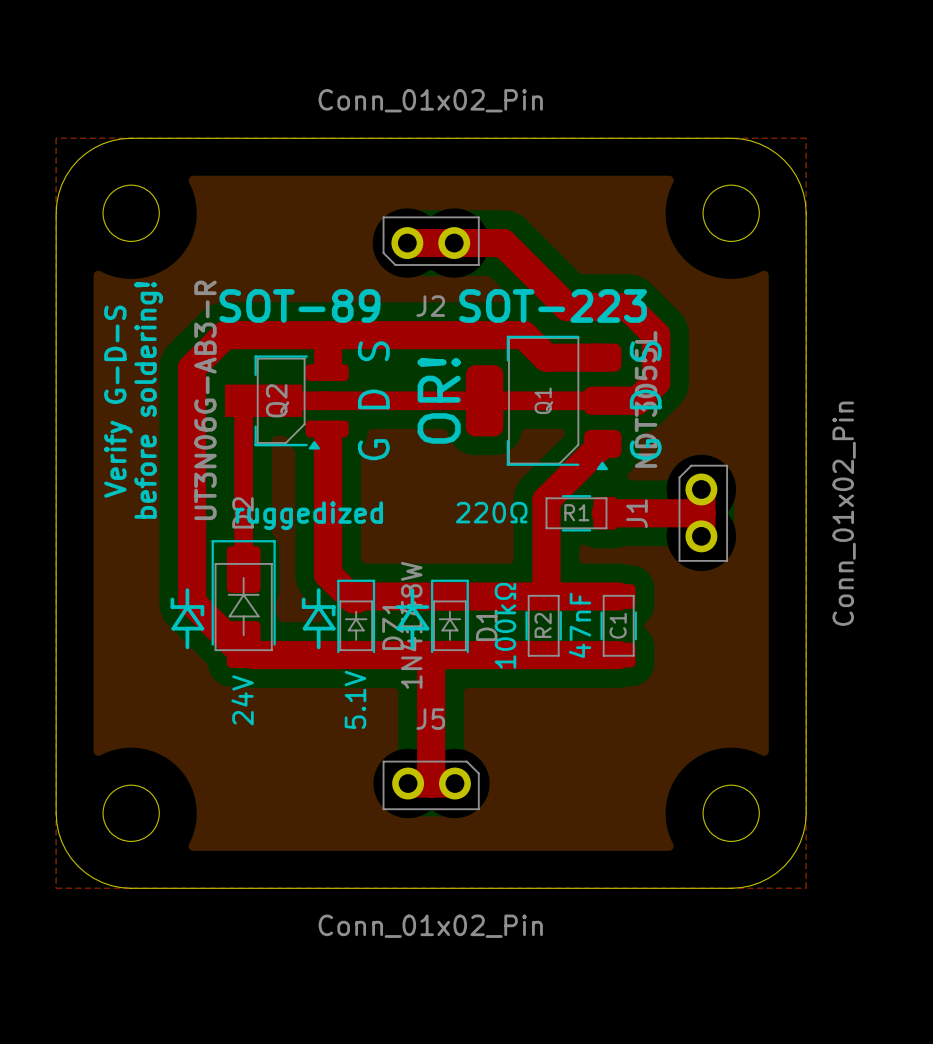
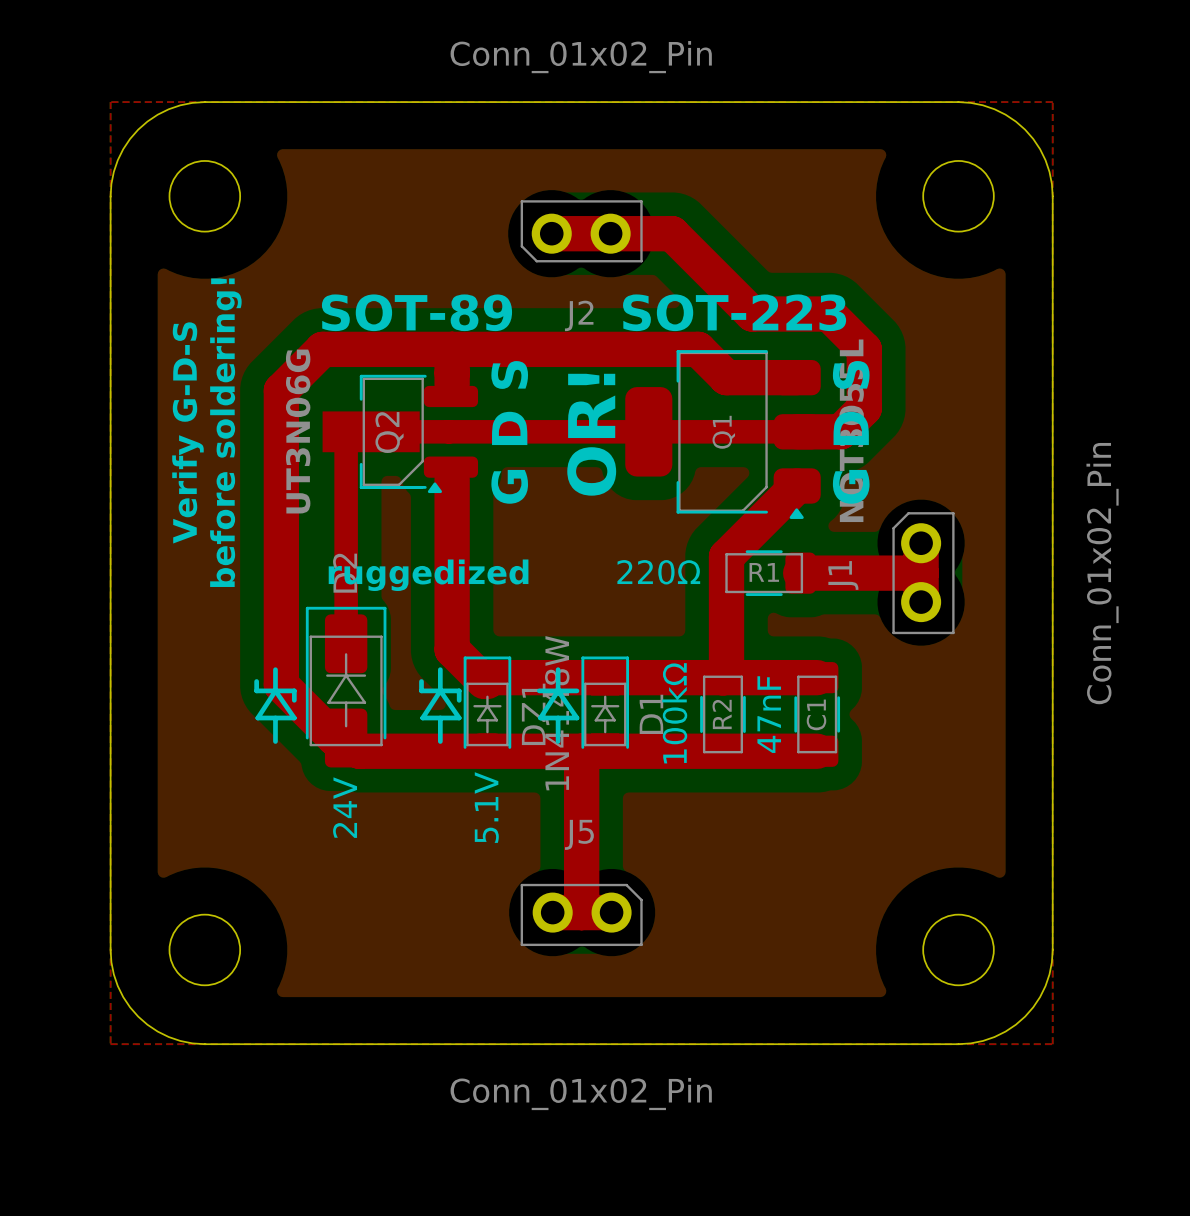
Q2 value: UT3N06G-AB3-R (205, 400) -> UT3N06G (298, 431)

